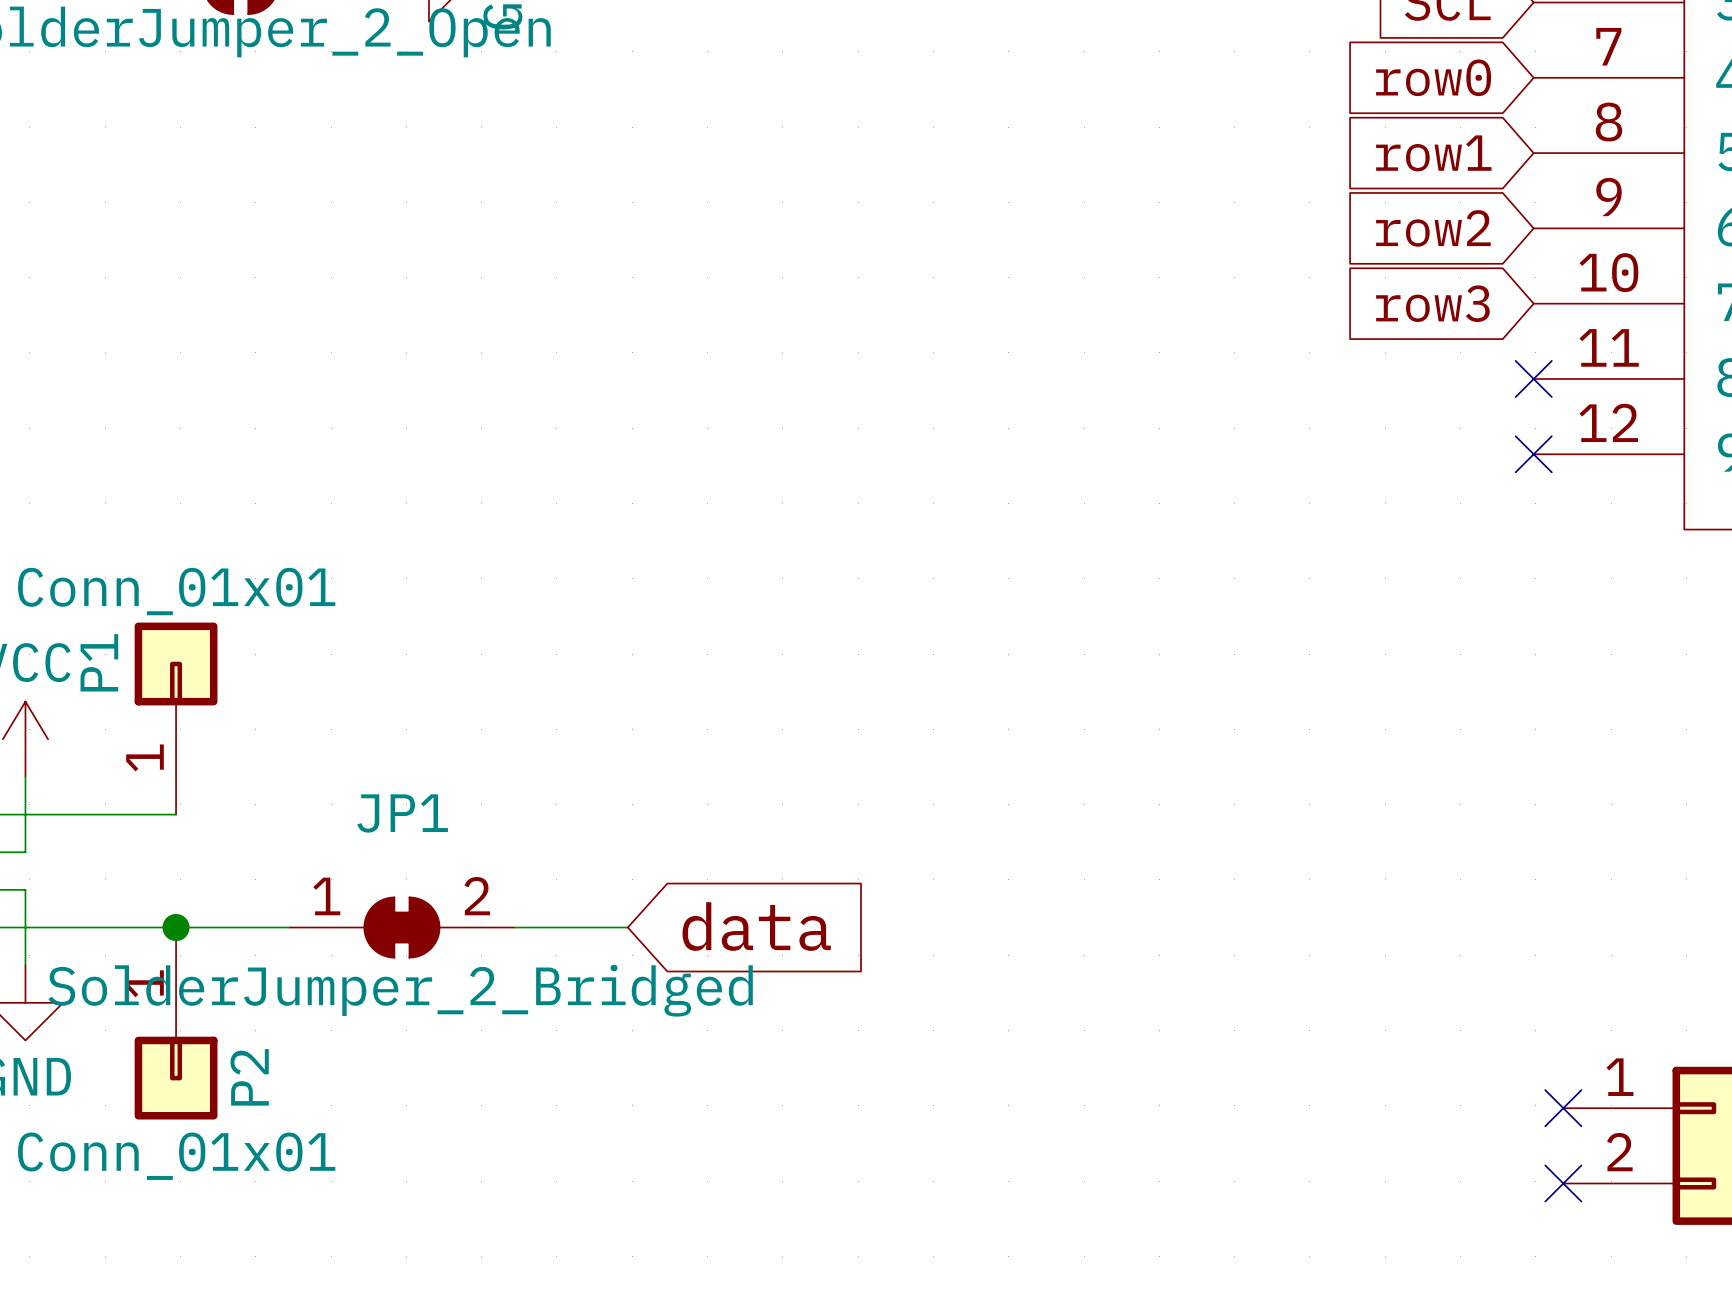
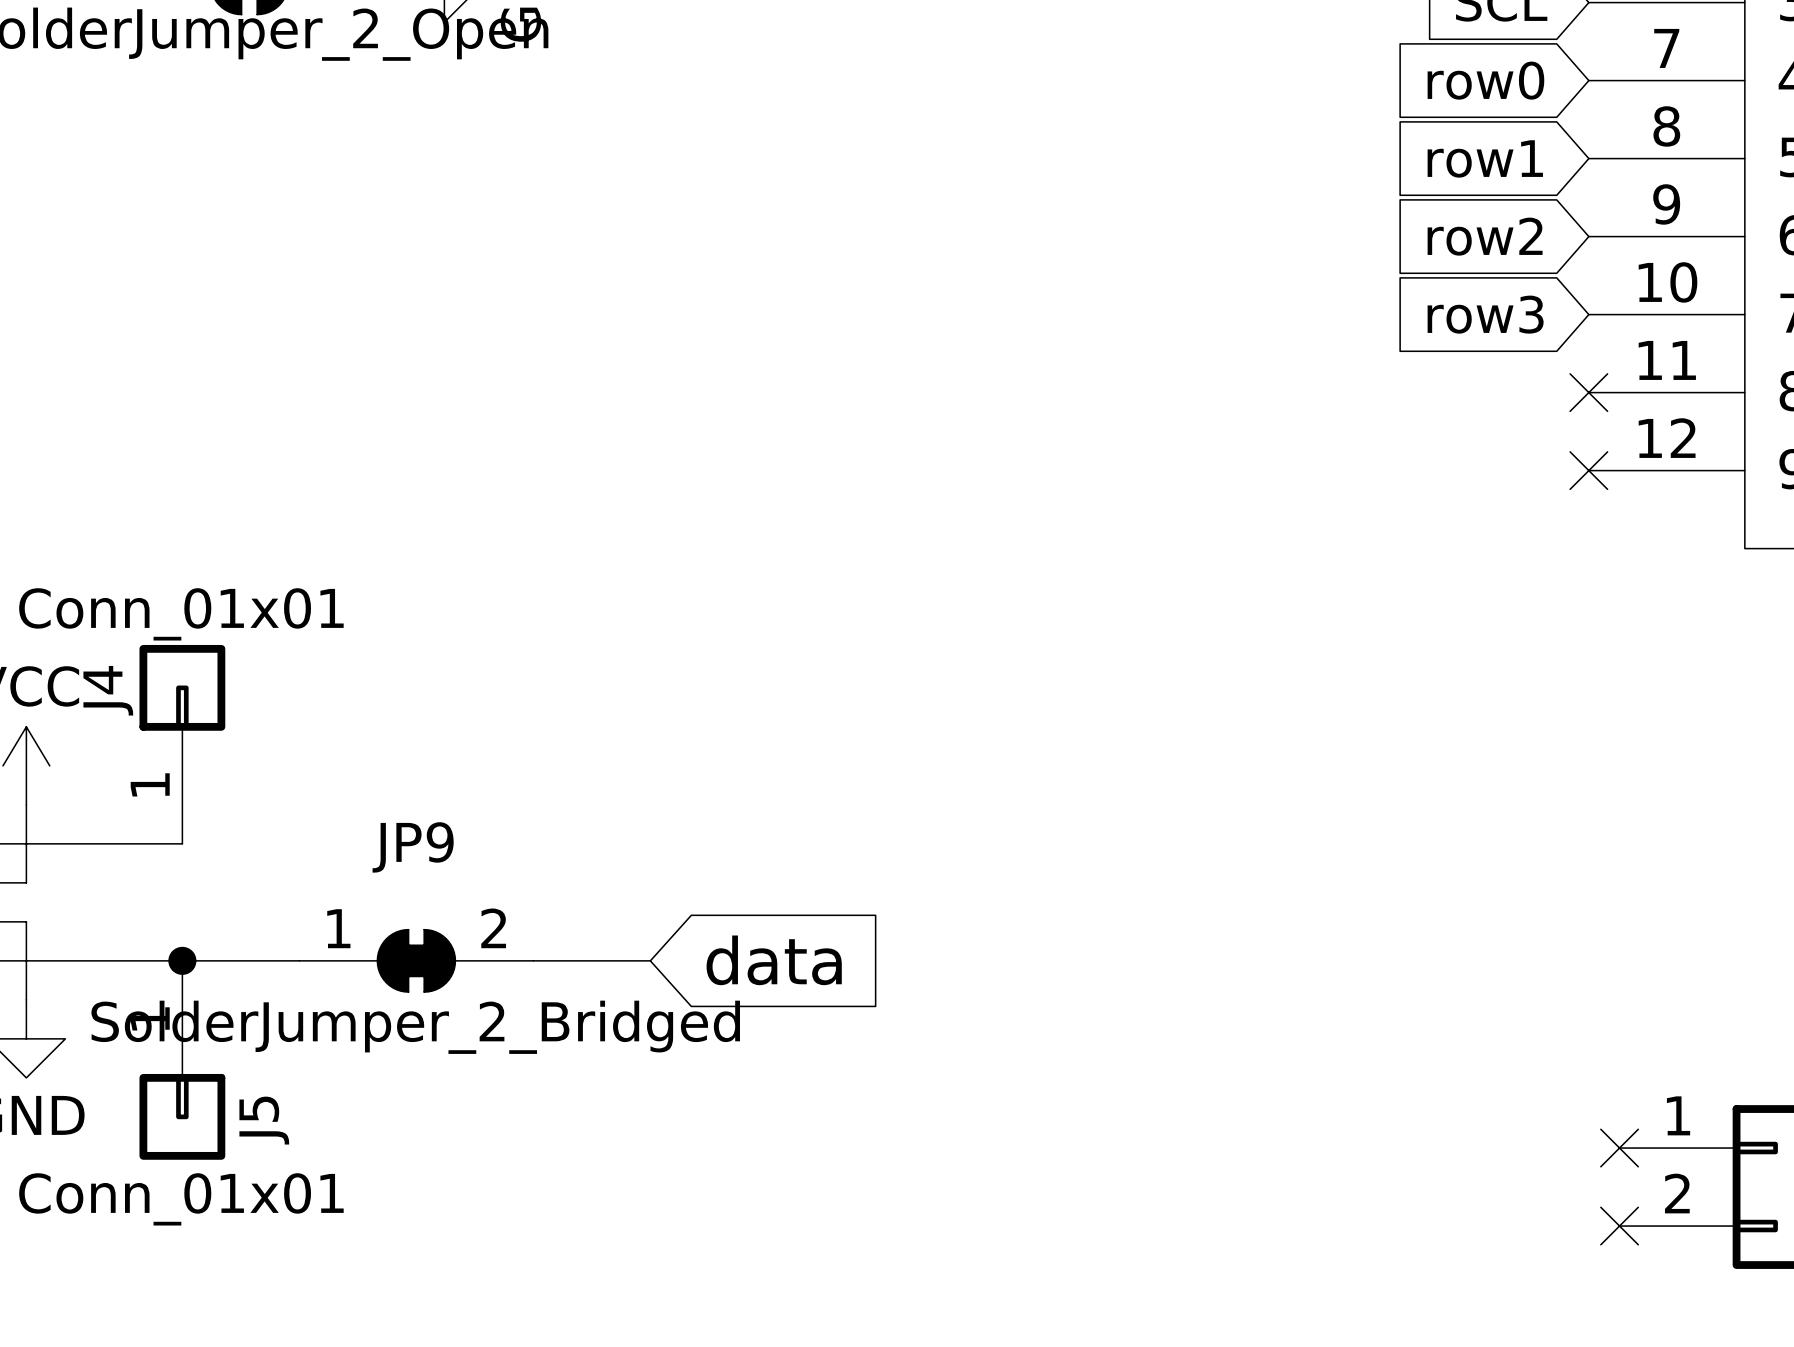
P1 name: P1 (99, 662) -> J4 (108, 690)
JP1 name: JP1 (402, 813) -> JP9 (413, 847)
P2 name: P2 (249, 1077) -> J5 (264, 1120)

